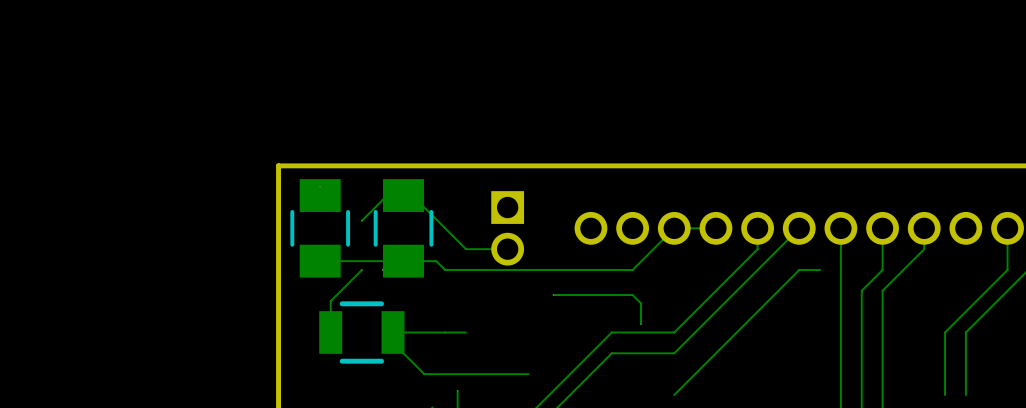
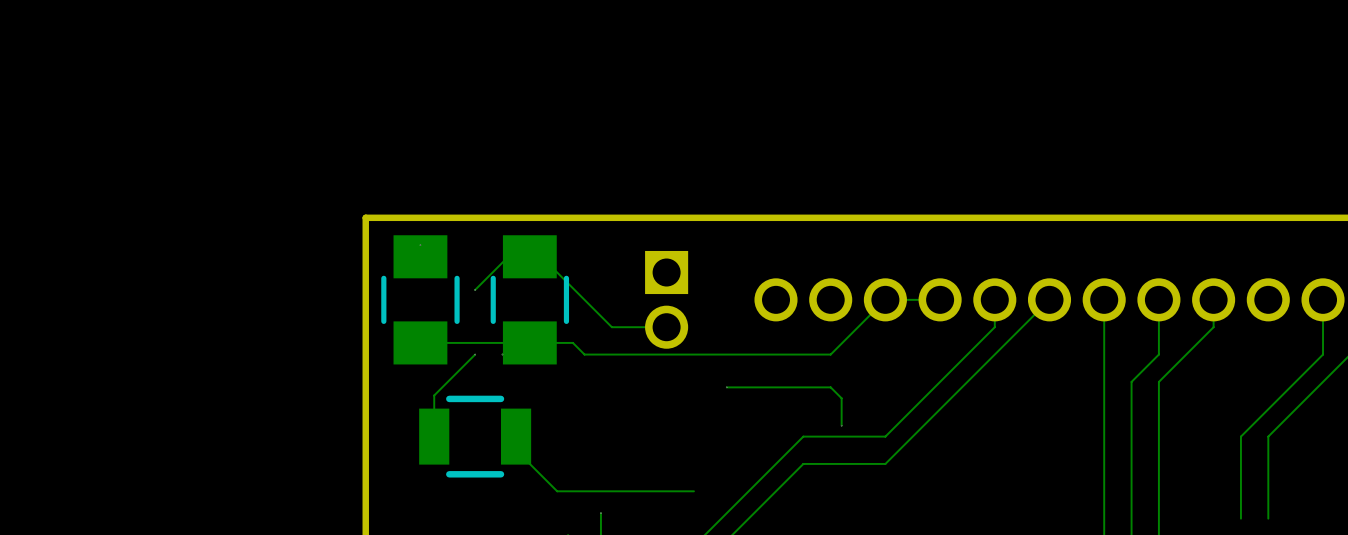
track: (820, 270) (799, 270) (674, 394) -> none
track: (465, 332) (393, 332) -> none

